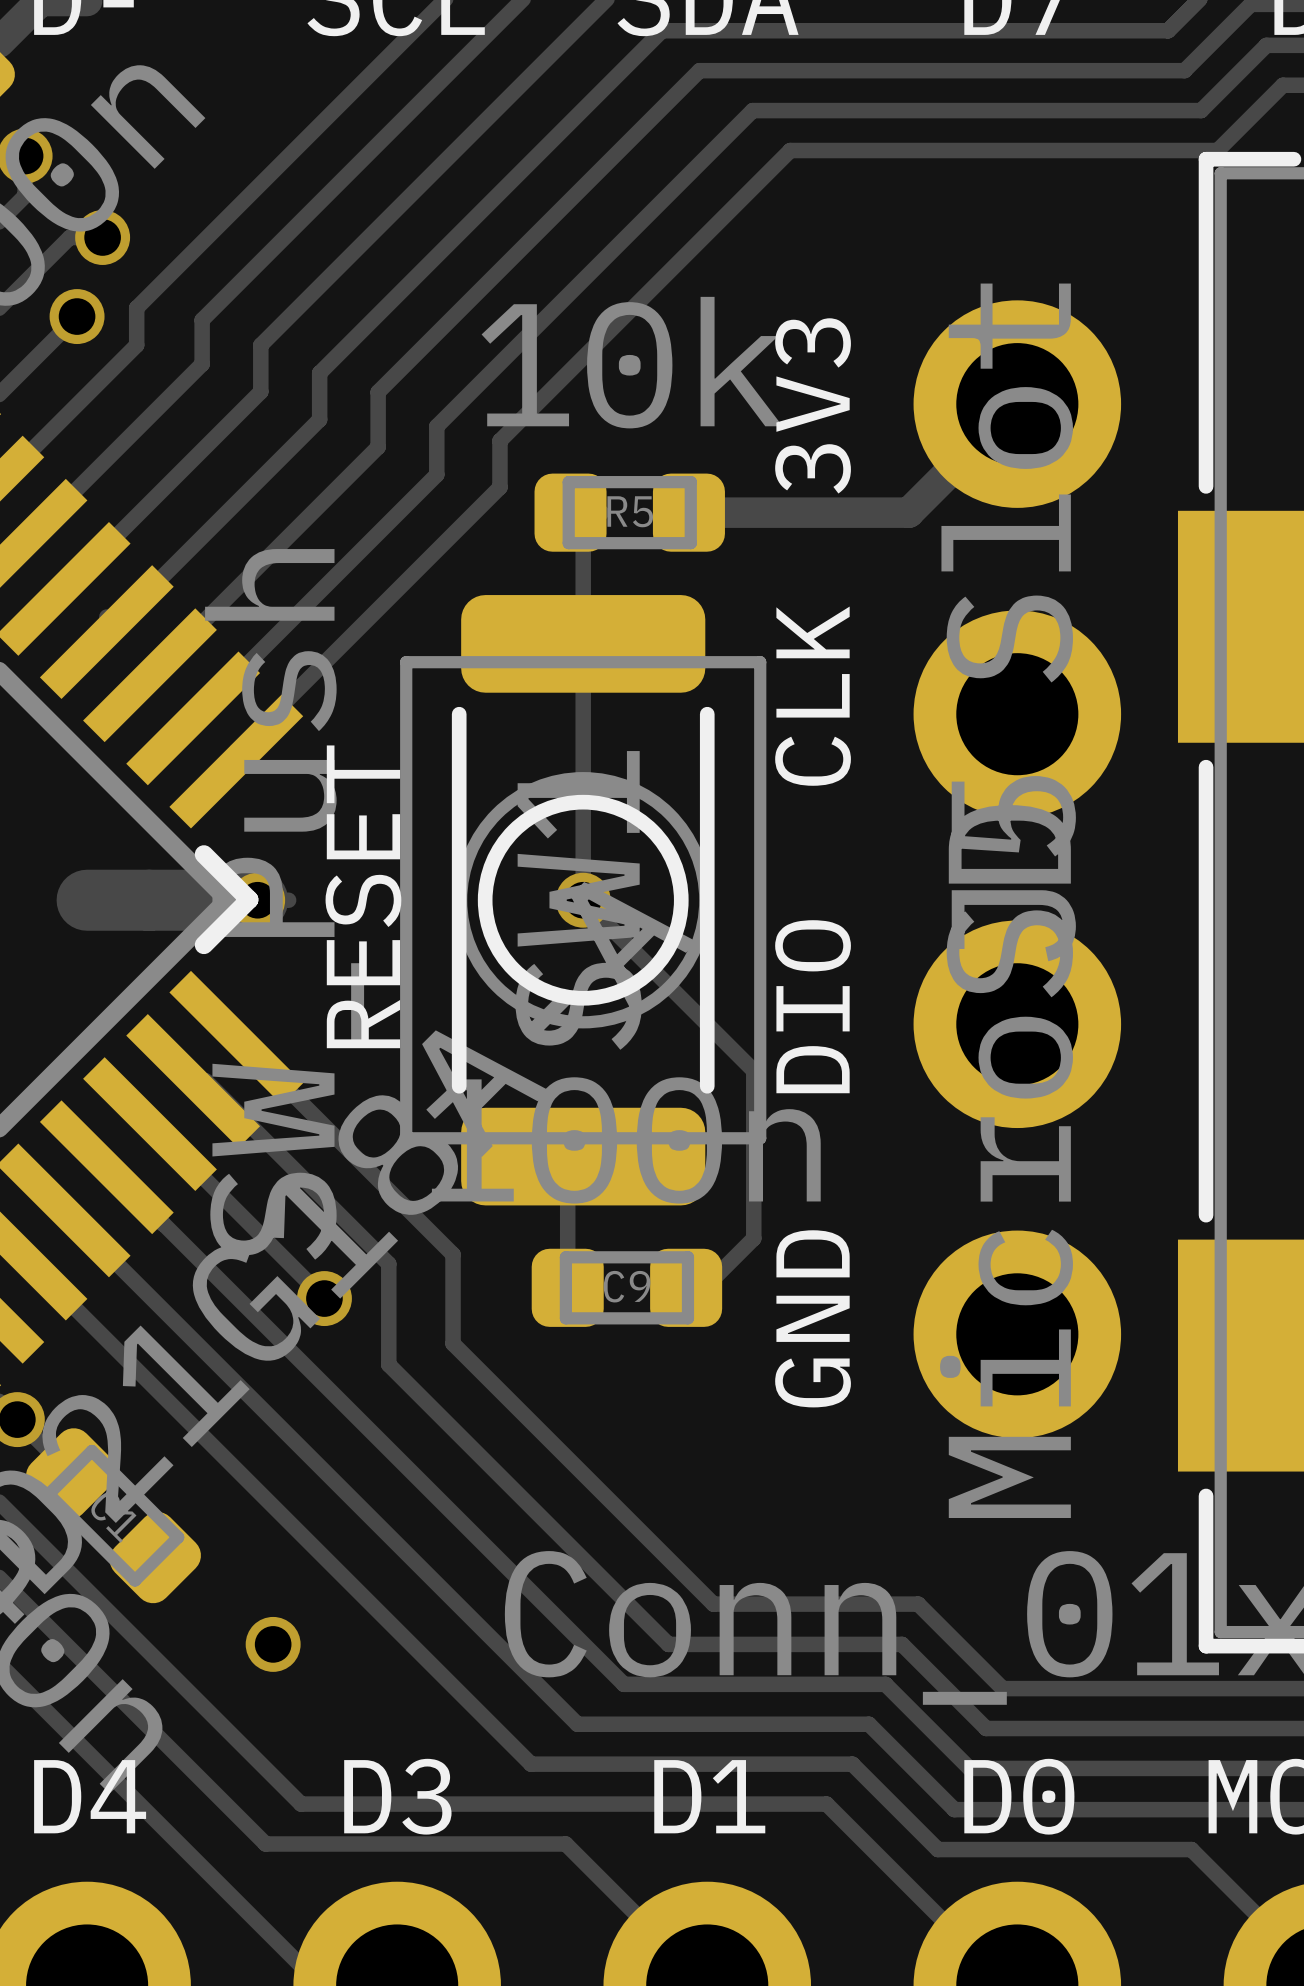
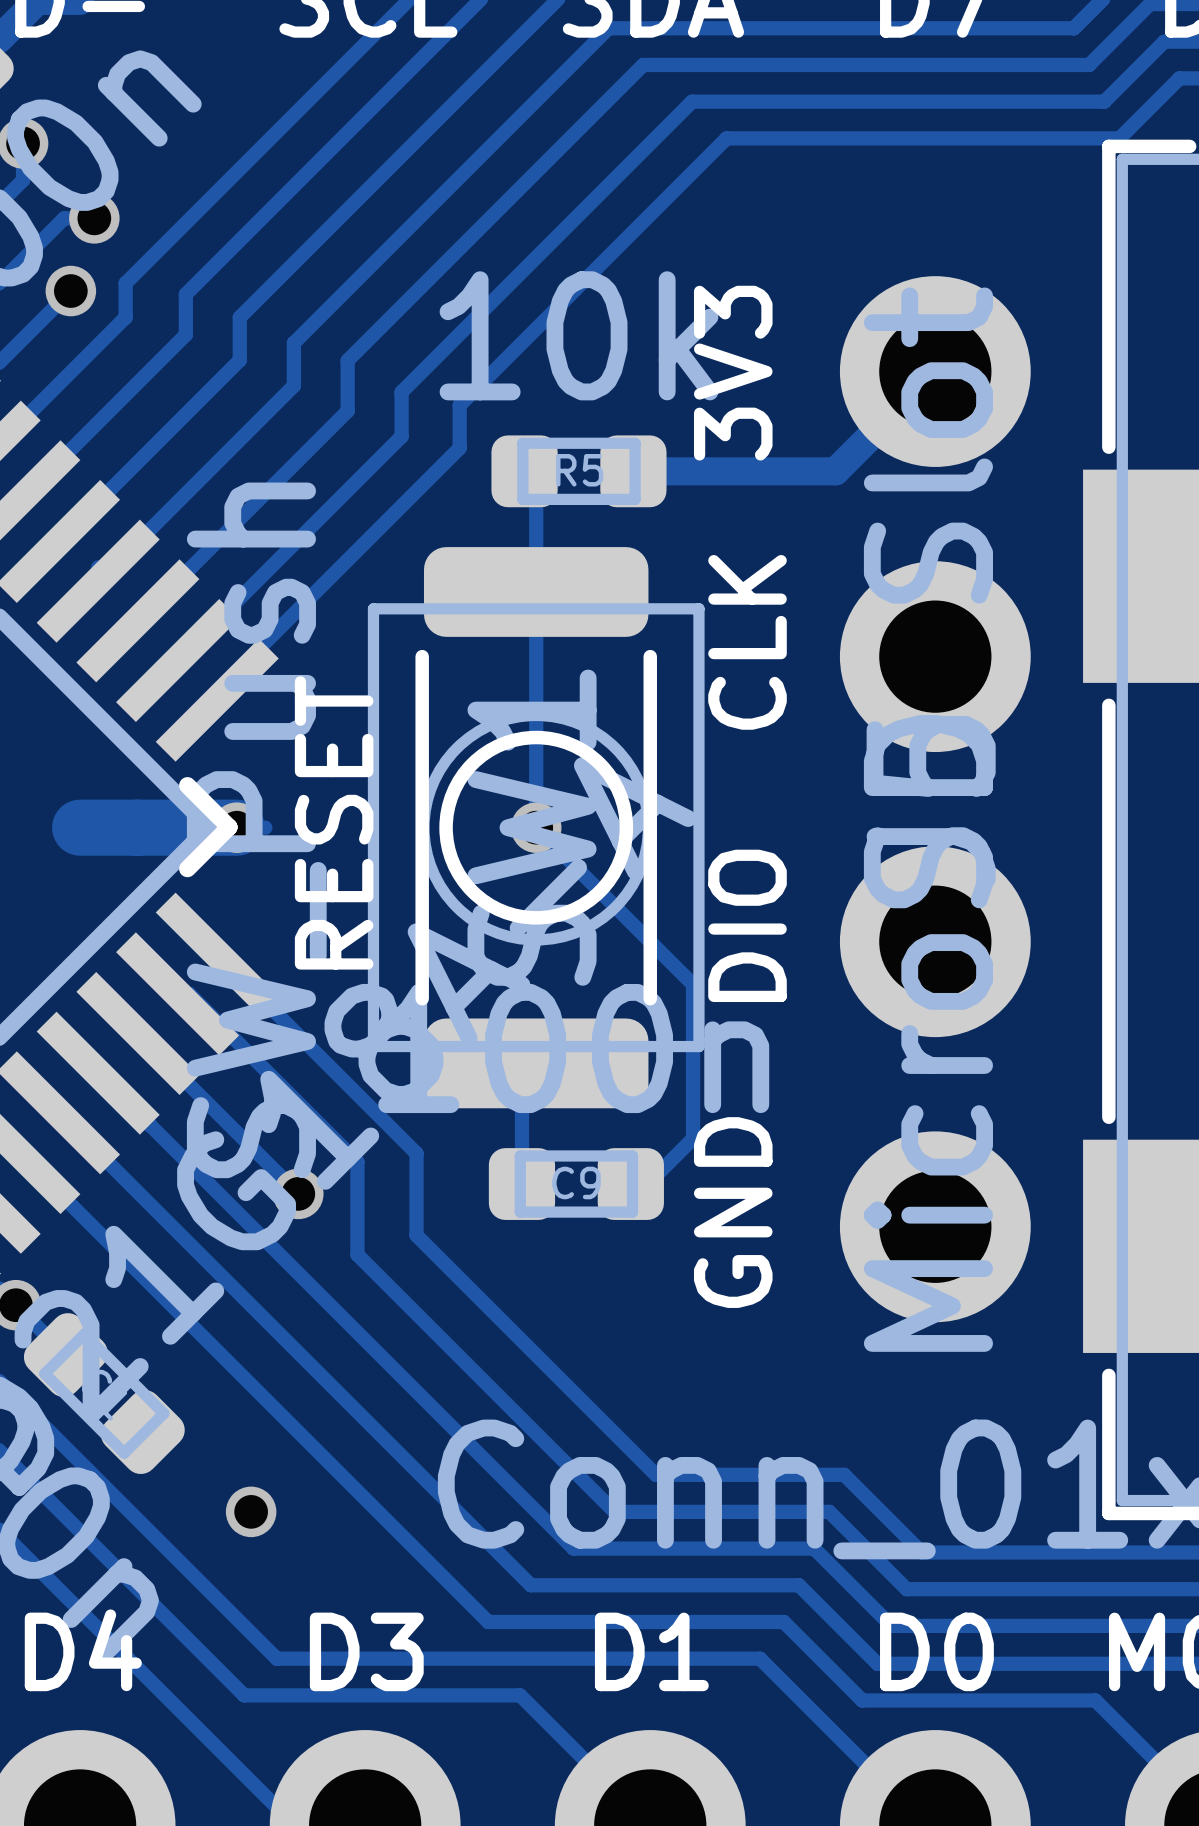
text position: 3V3 (813, 405) -> 3V3 (733, 373)
text position: GND (813, 1318) -> GND (733, 1212)

